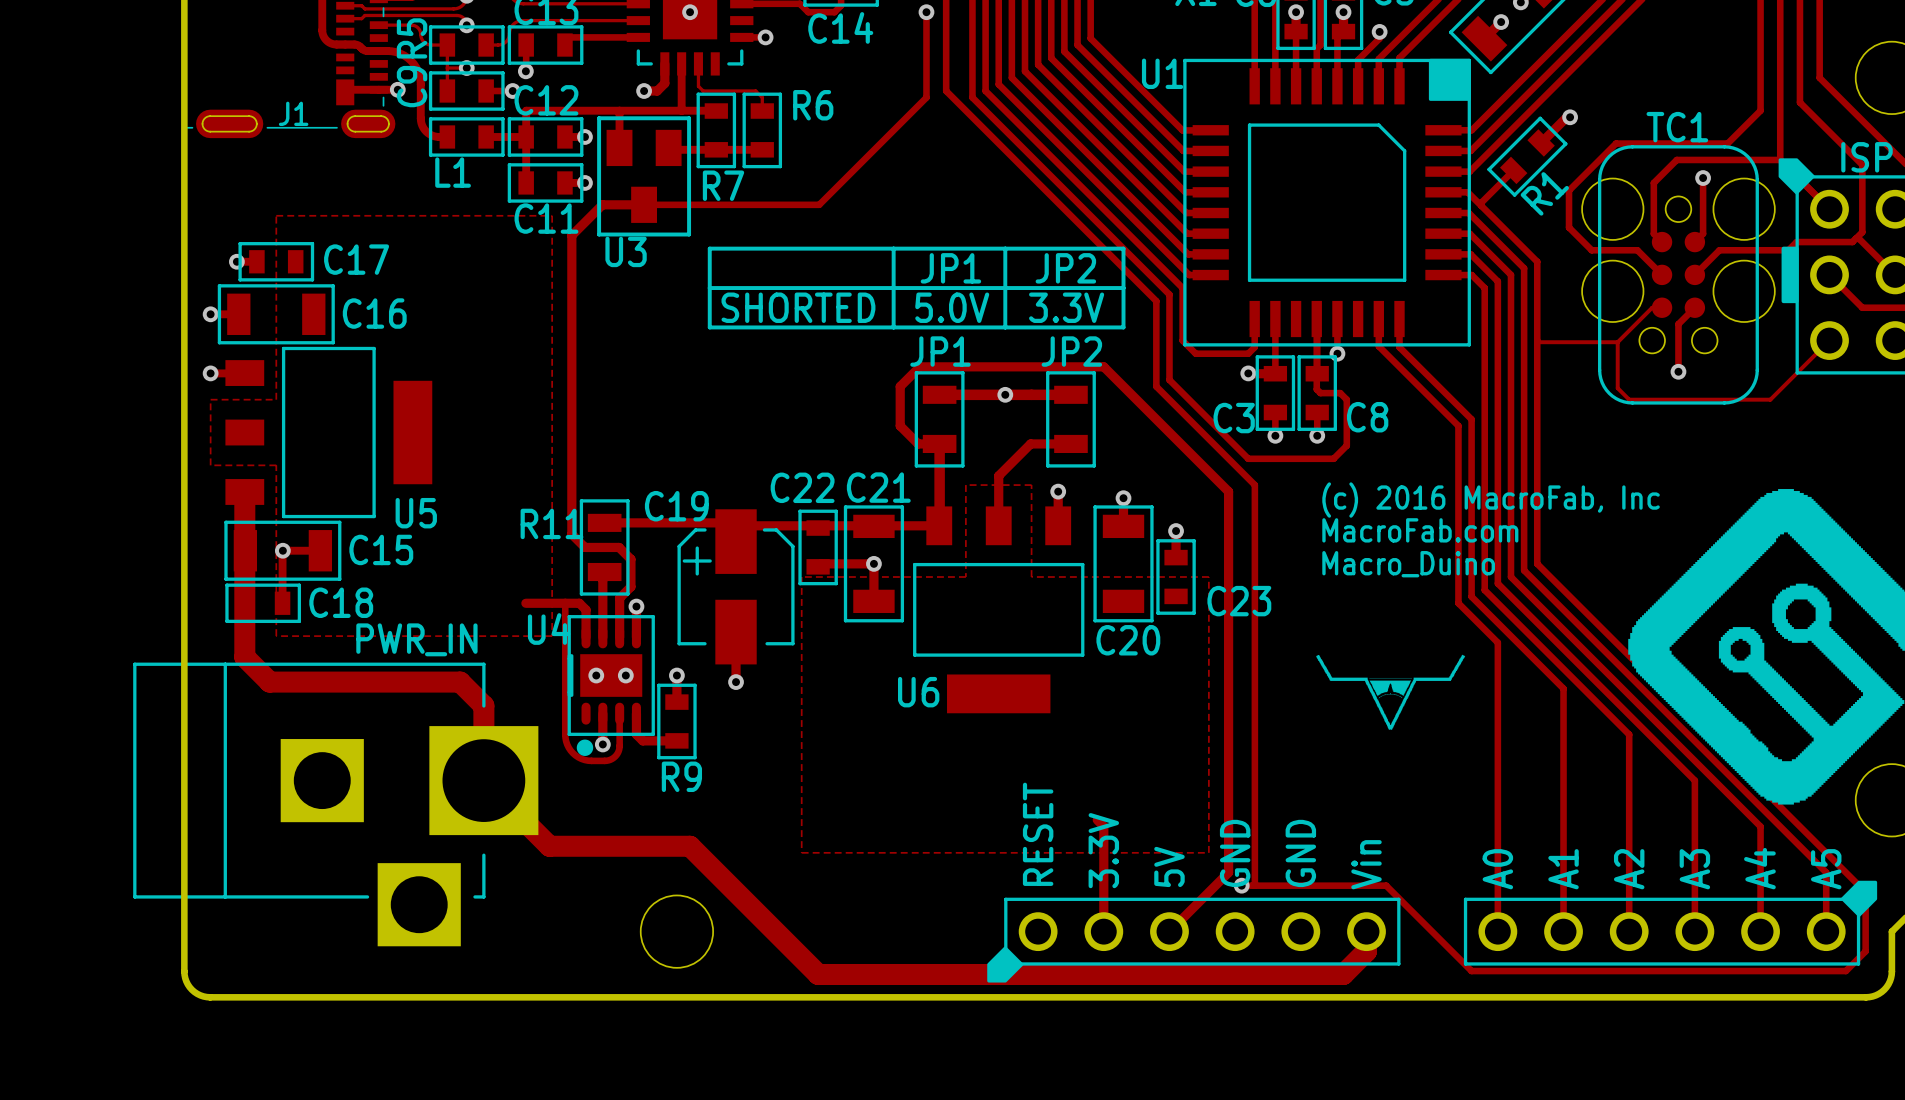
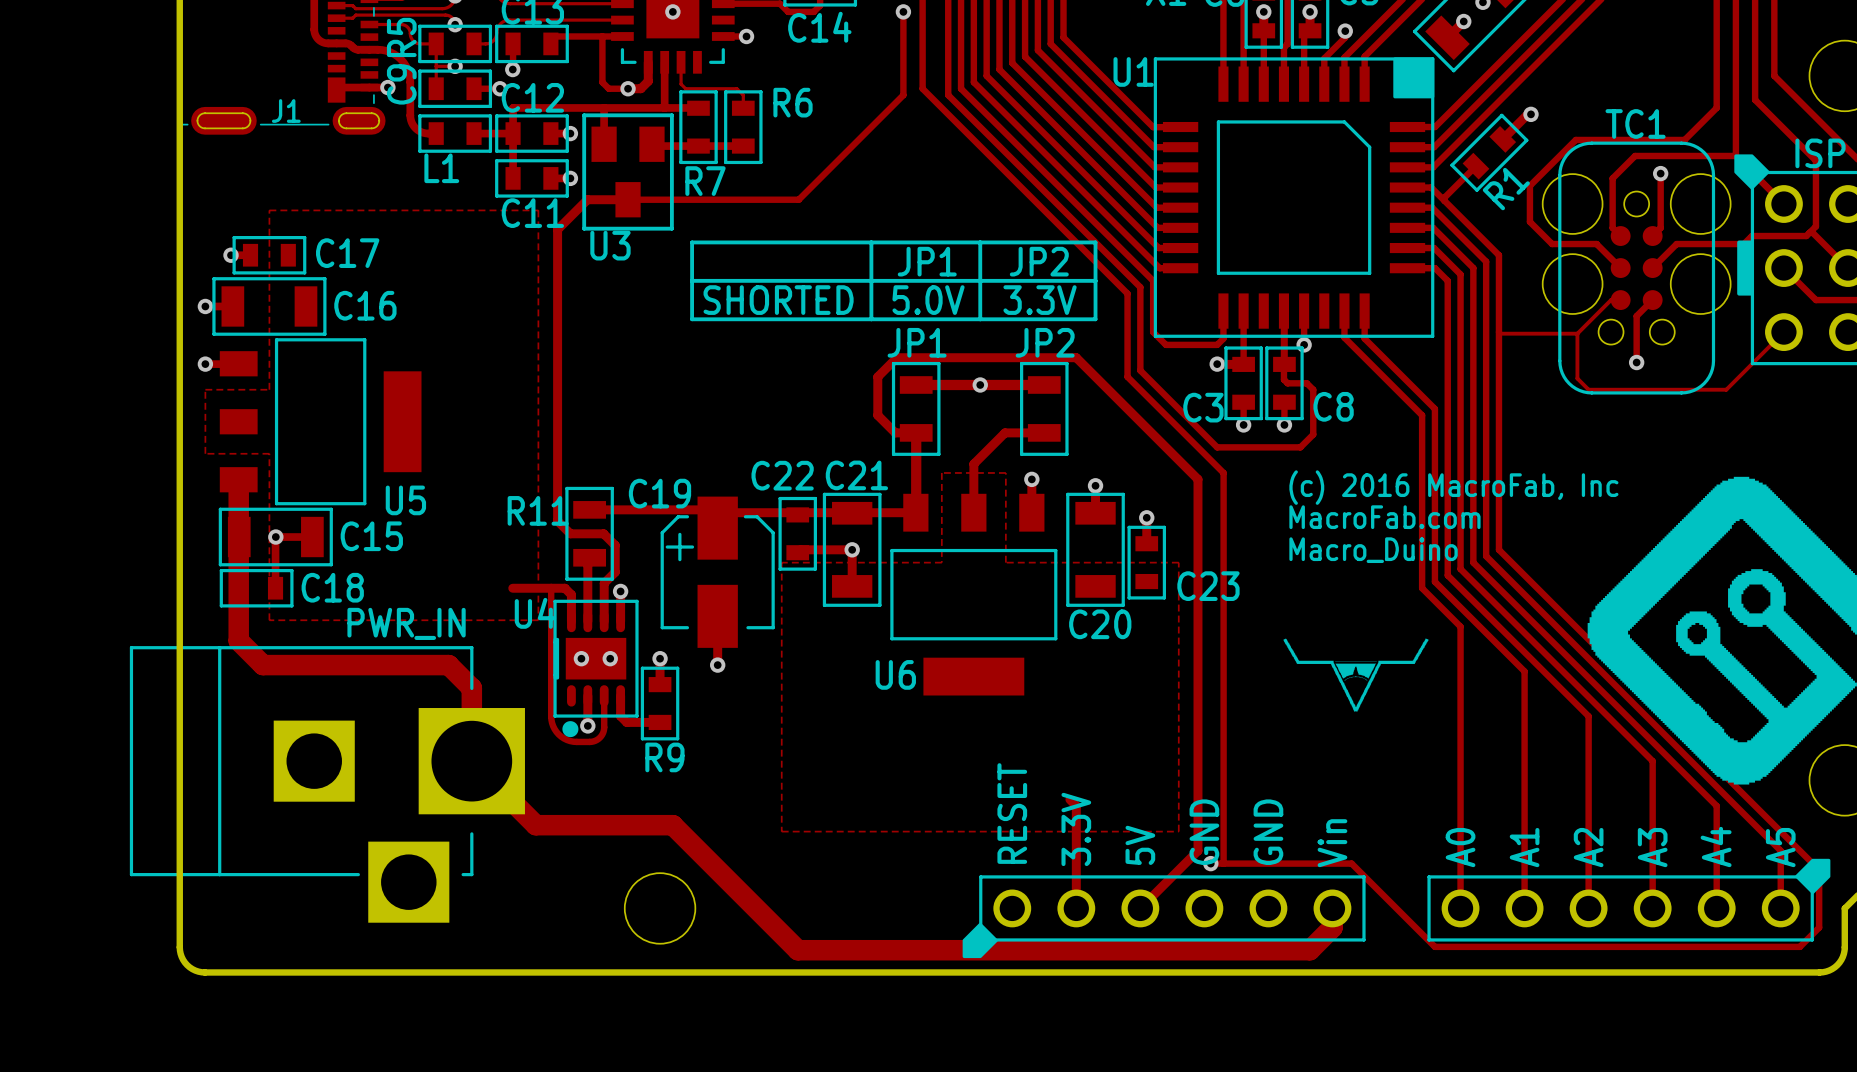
track: none -> (602, 36) (602, 82) (608, 88) (628, 88)

